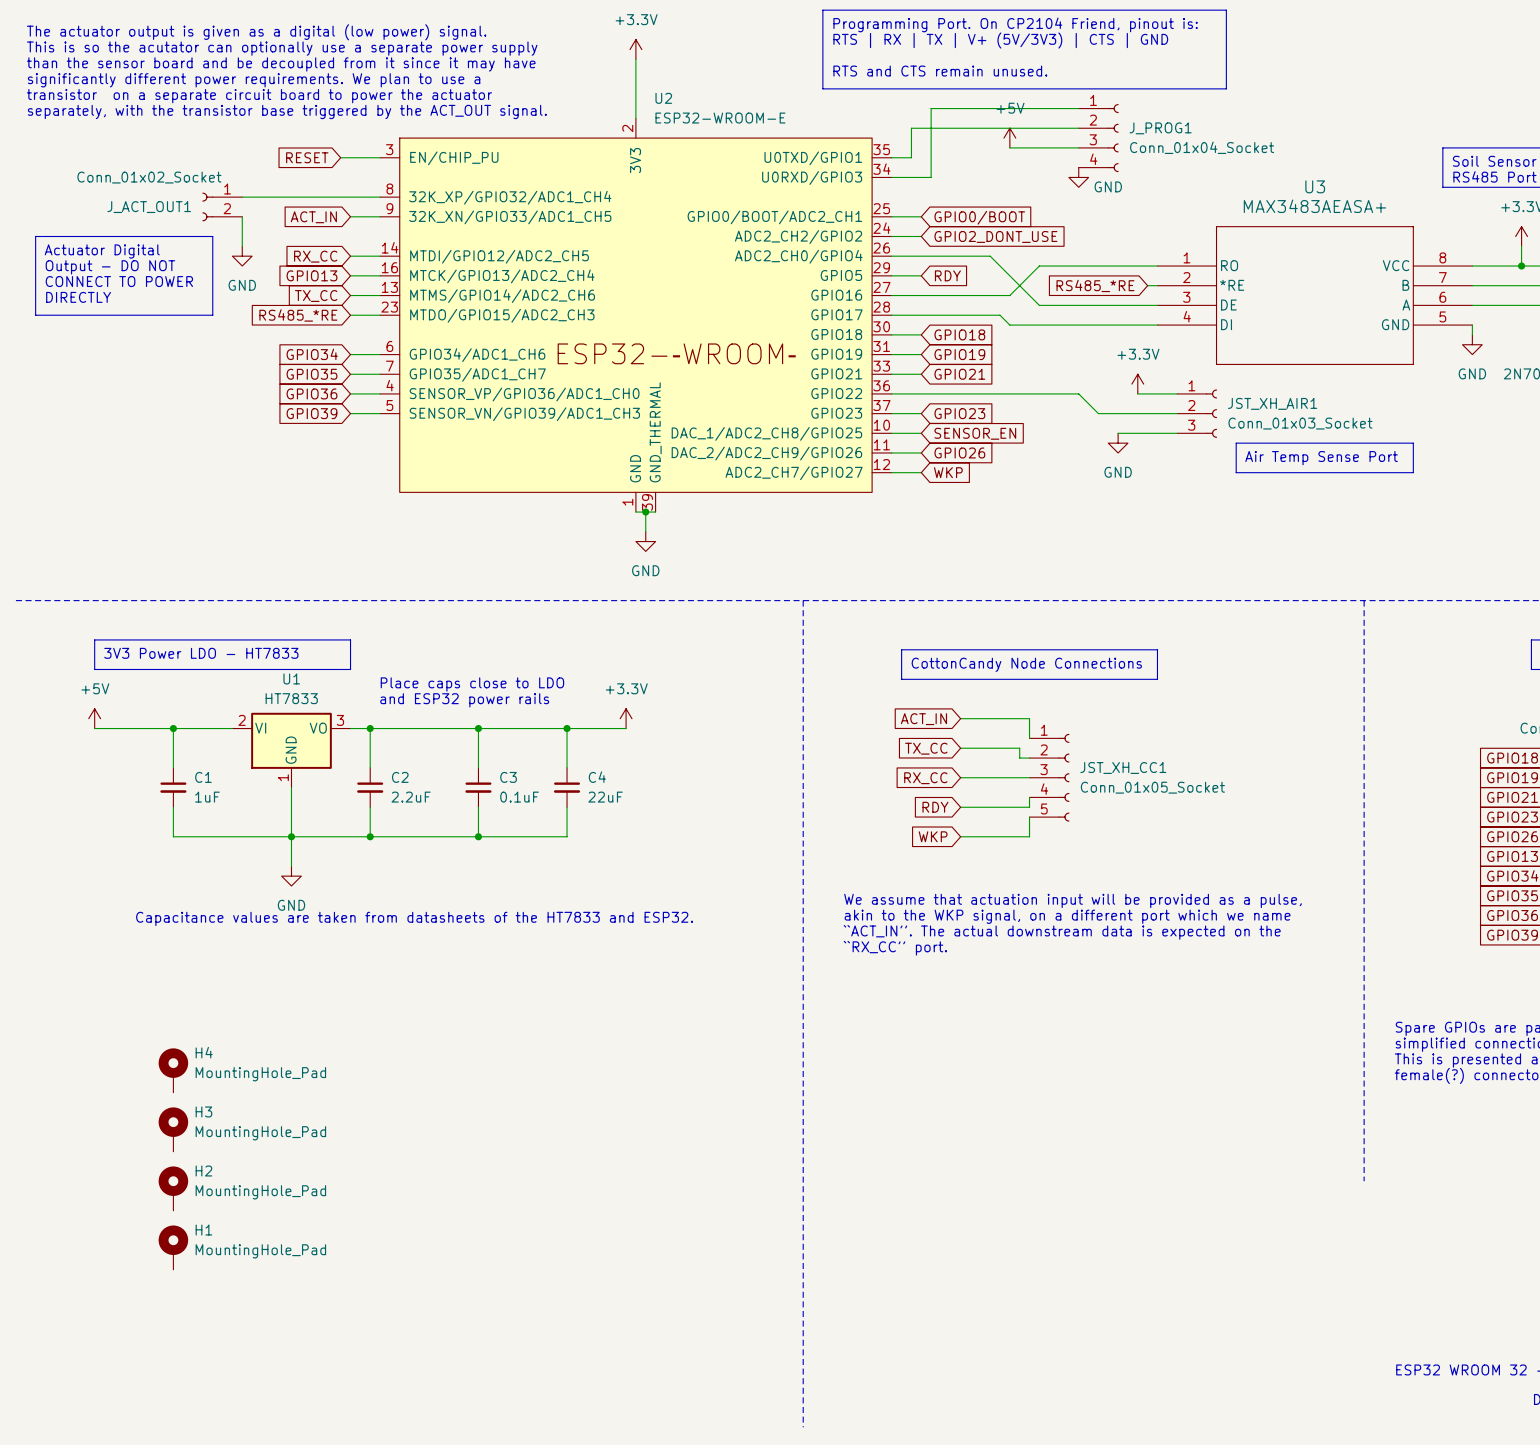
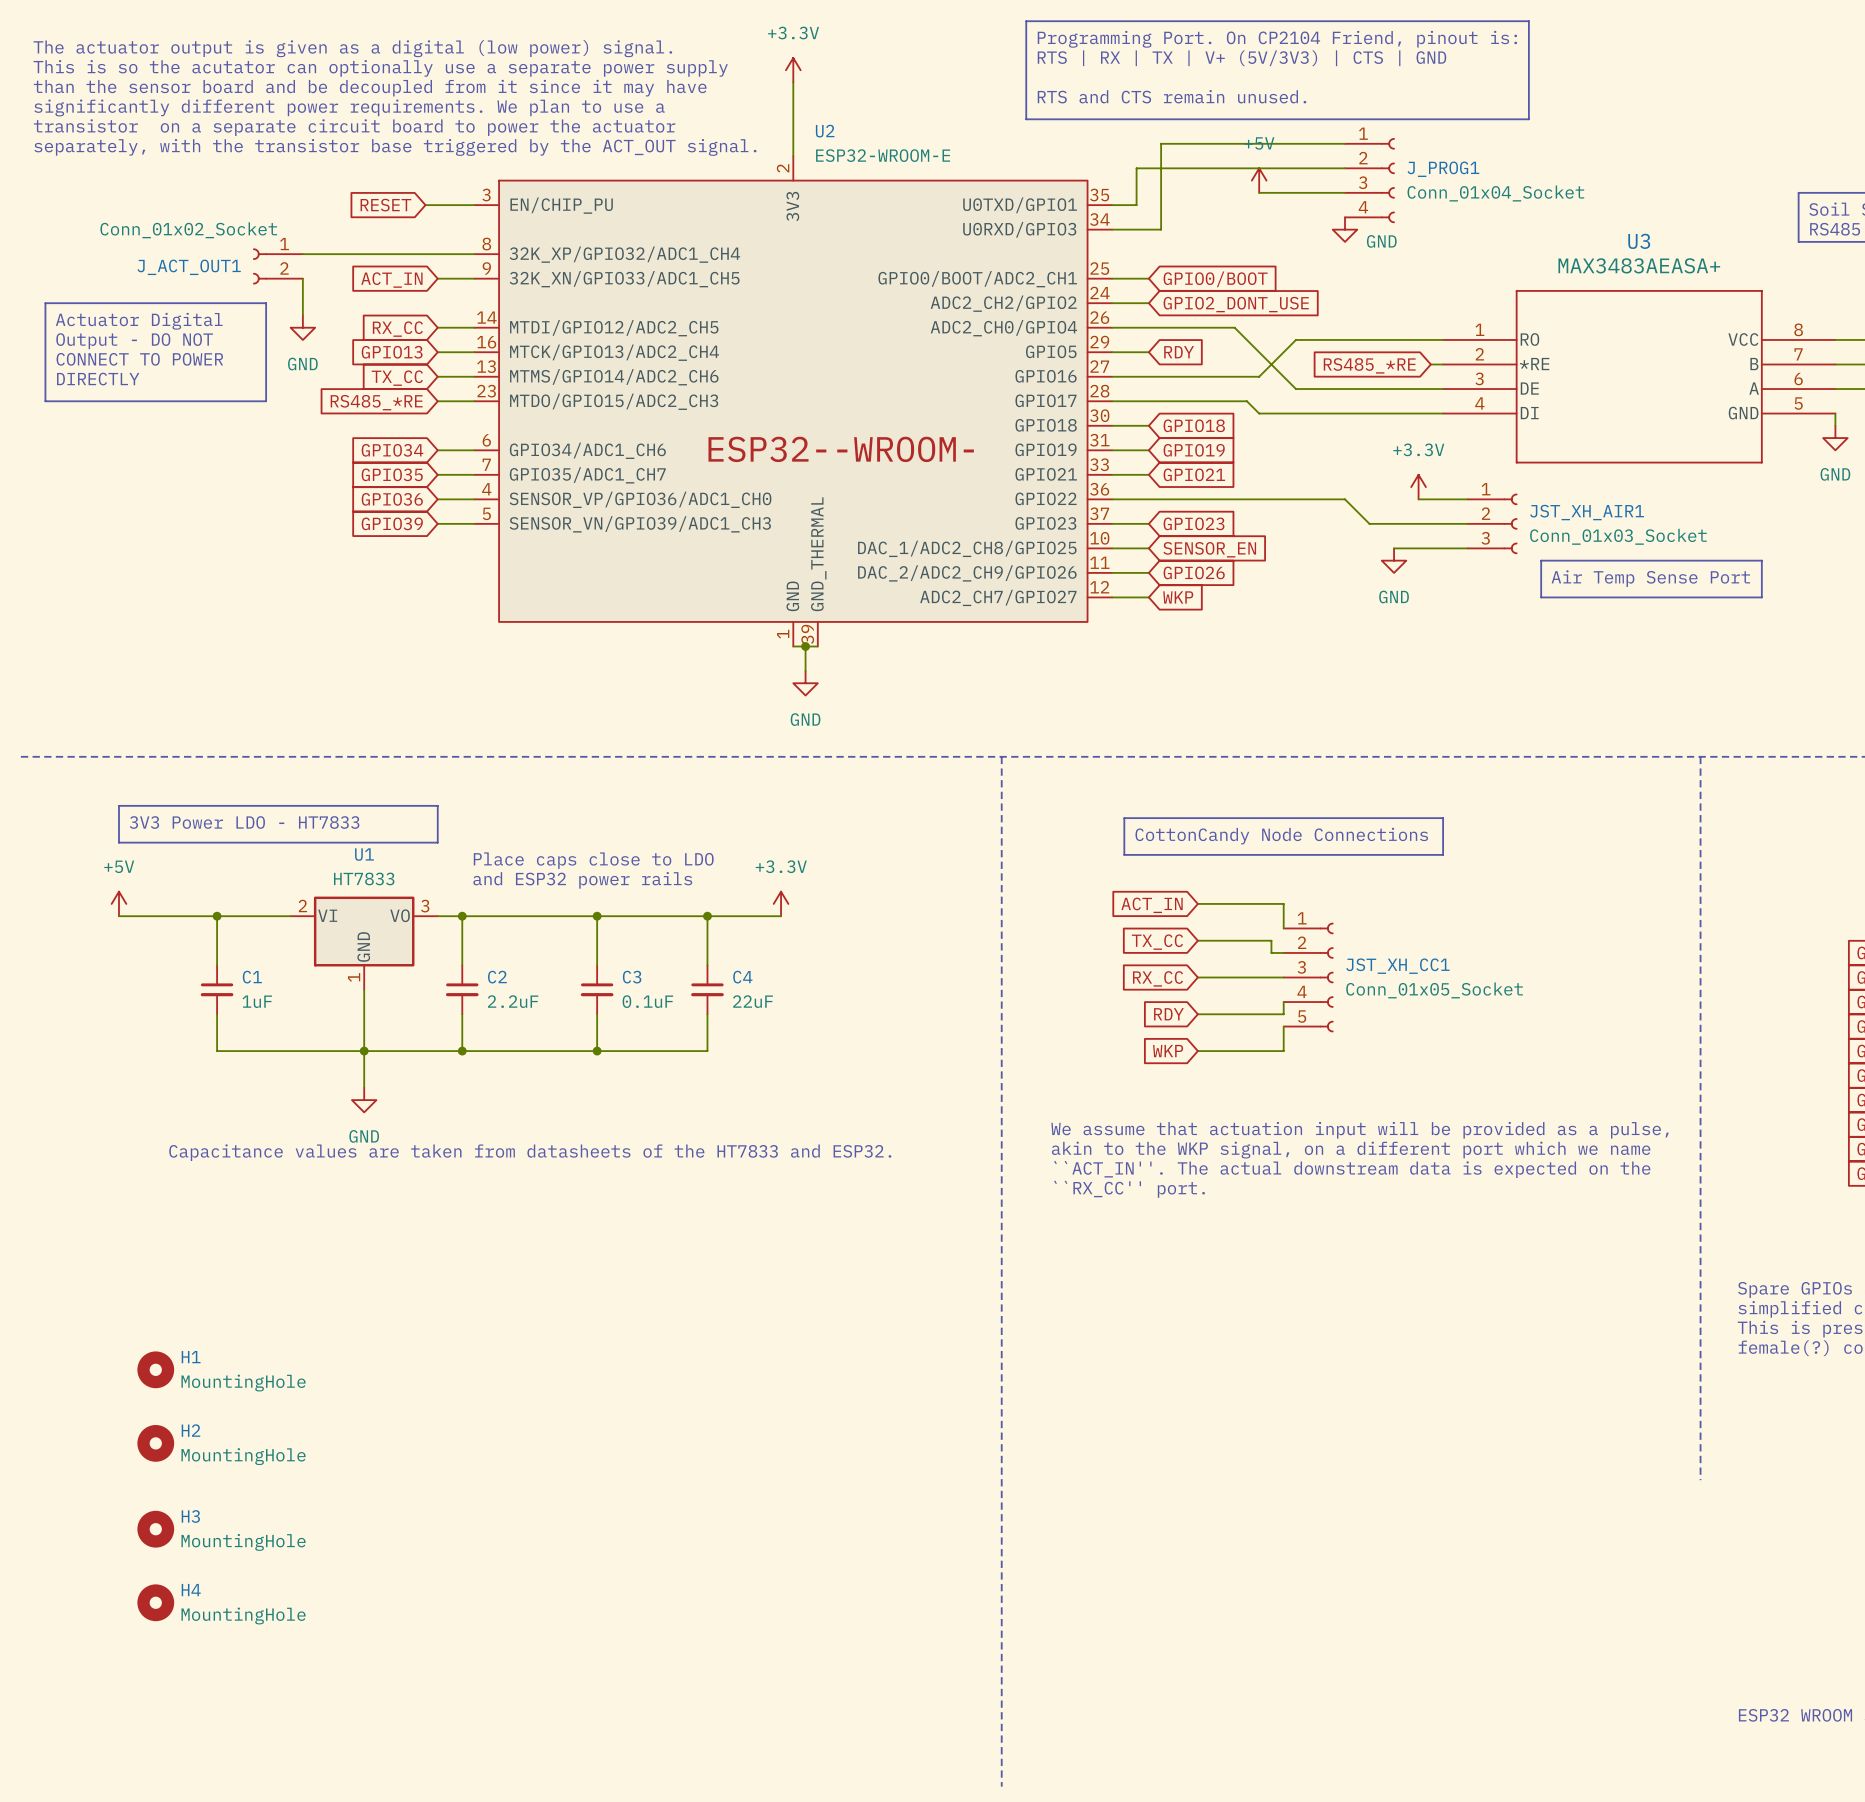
H4 symbol: [158, 1048, 189, 1093] -> [137, 1584, 175, 1622]
H4 value: MountingHole_Pad (260, 1074) -> MountingHole (243, 1615)
H3 symbol: [158, 1107, 189, 1152] -> [137, 1510, 175, 1548]
H3 value: MountingHole_Pad (260, 1133) -> MountingHole (243, 1542)
H2 symbol: [158, 1166, 189, 1211] -> [137, 1425, 175, 1462]
H2 value: MountingHole_Pad (260, 1192) -> MountingHole (243, 1456)
H1 symbol: [158, 1225, 189, 1270] -> [137, 1351, 175, 1389]
H1 value: MountingHole_Pad (260, 1251) -> MountingHole (243, 1383)

